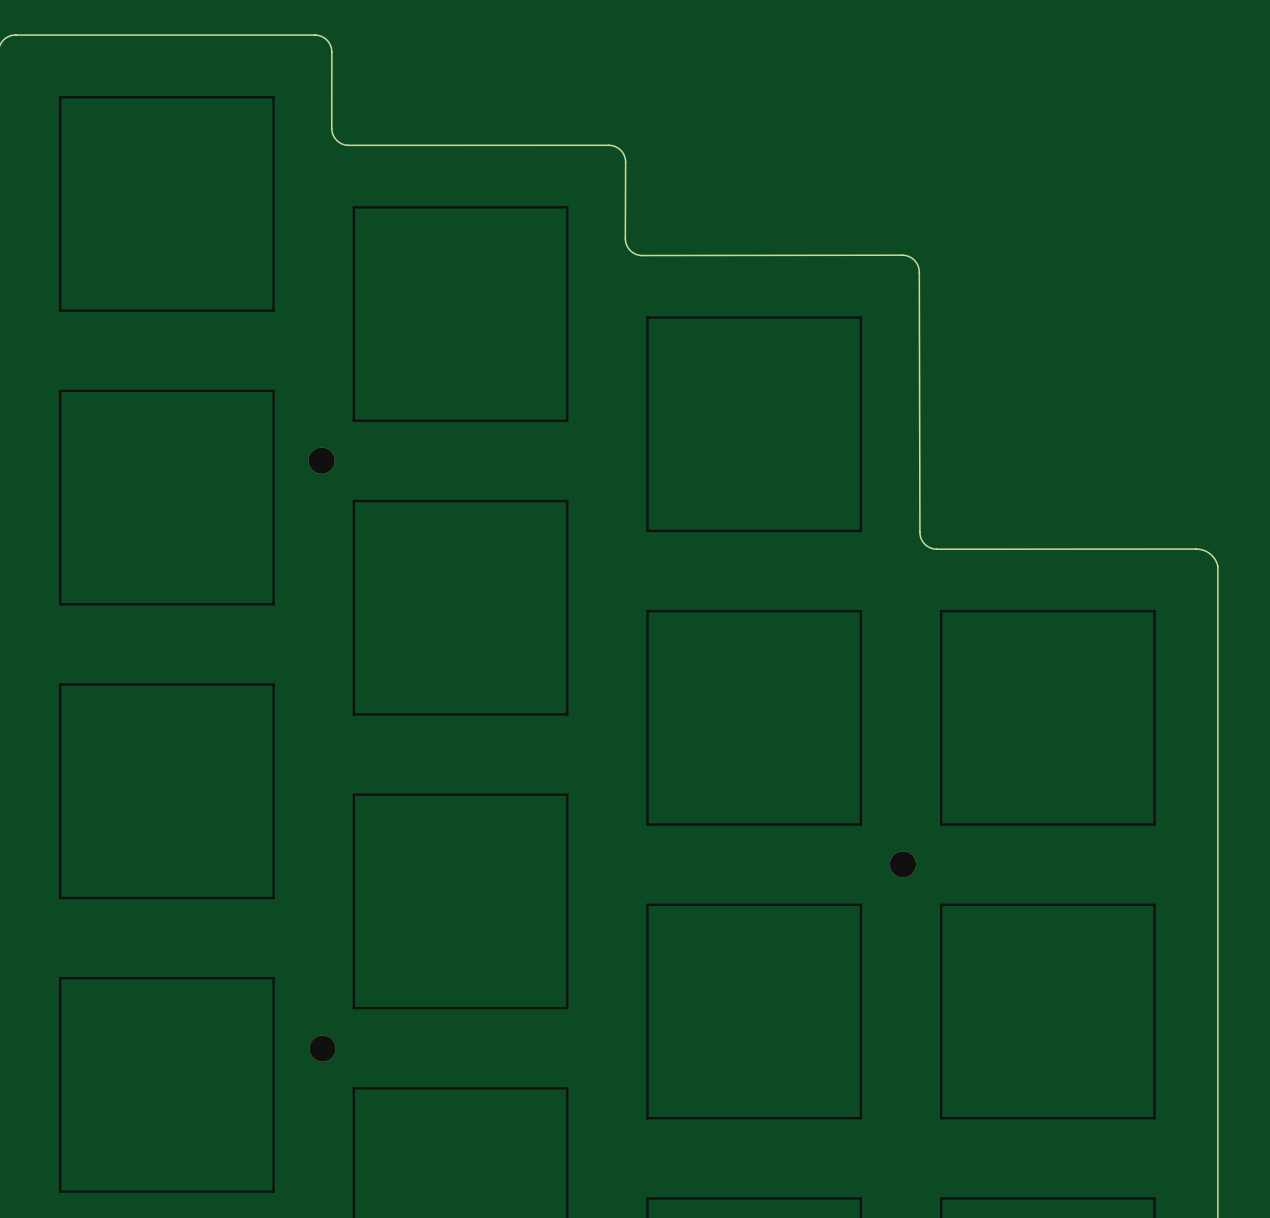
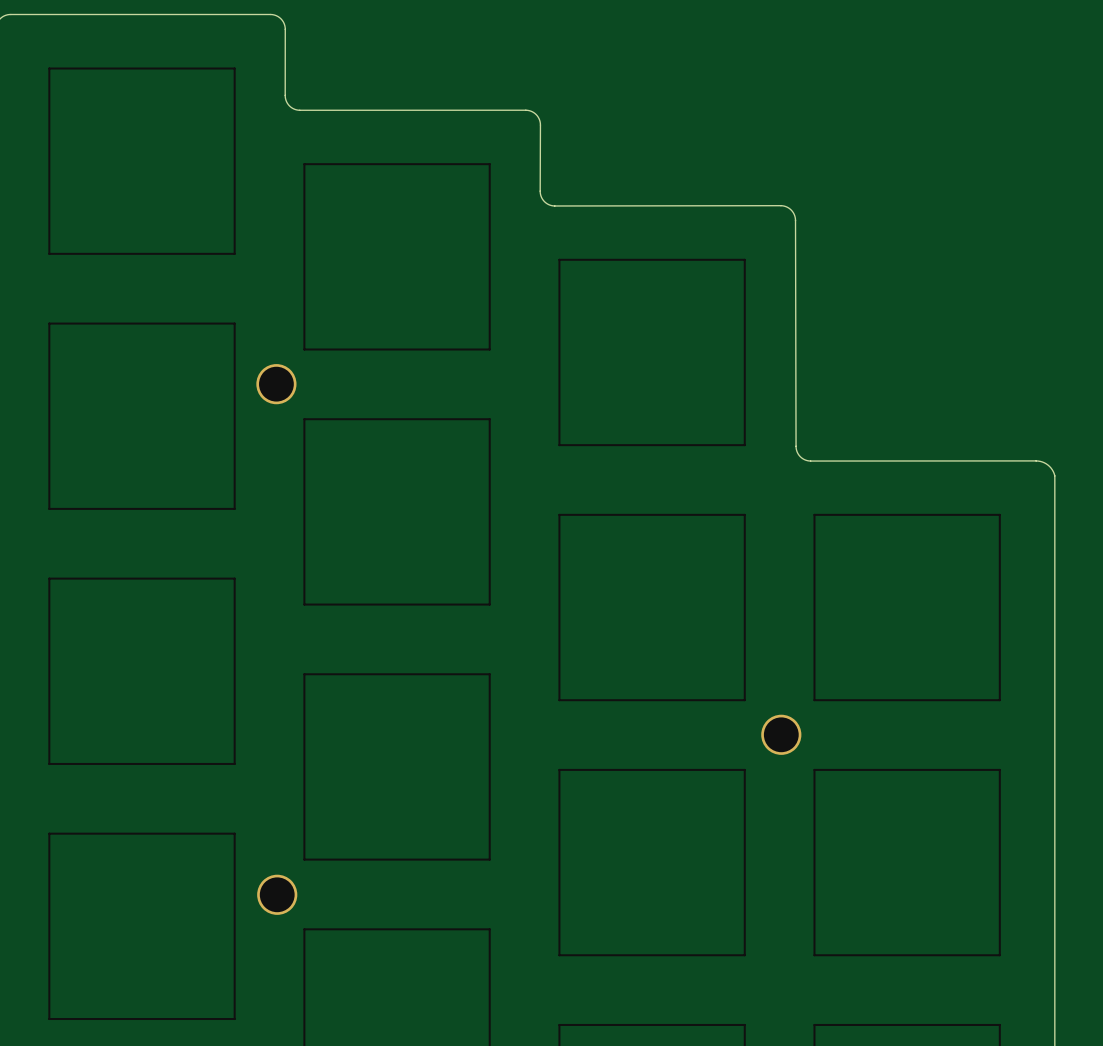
part footprint: [308, 447, 335, 474] -> [256, 364, 297, 405]
part footprint: [889, 851, 917, 878] -> [761, 714, 802, 755]
part footprint: [309, 1035, 336, 1062] -> [257, 874, 298, 915]

